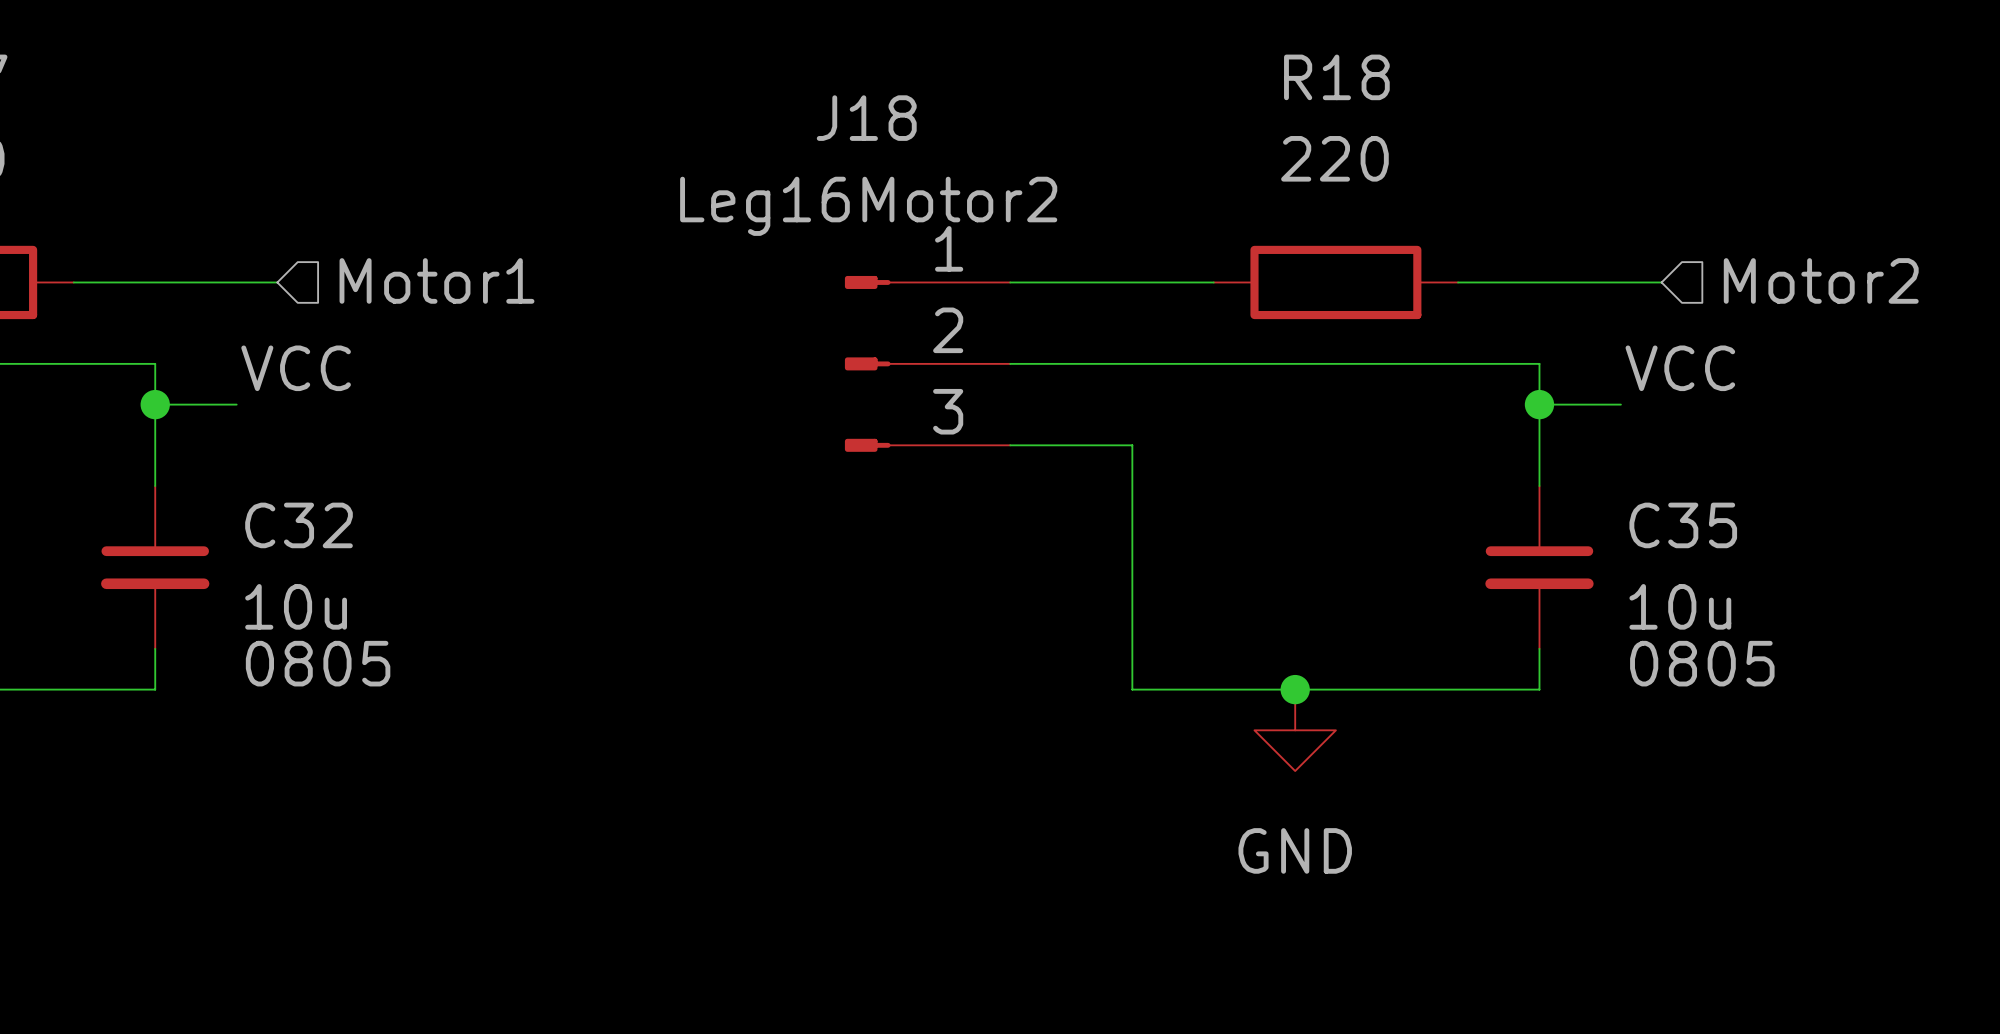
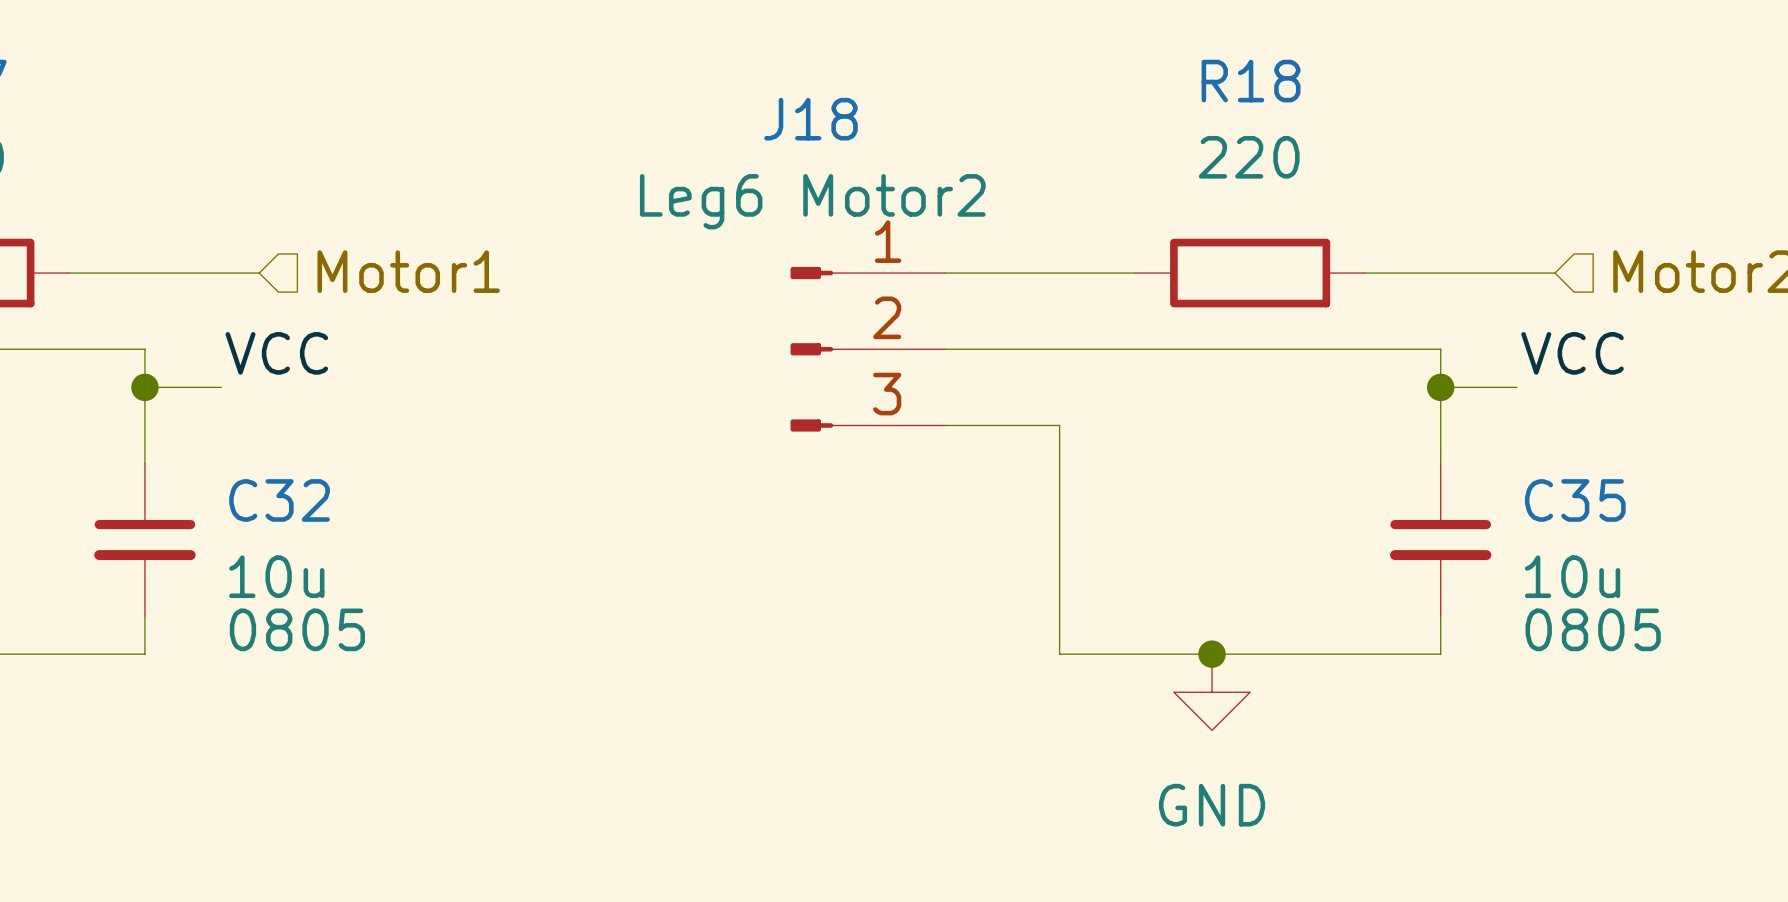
J18 value: Leg16Motor2 (868, 206) -> Leg6 Motor2 (812, 201)

